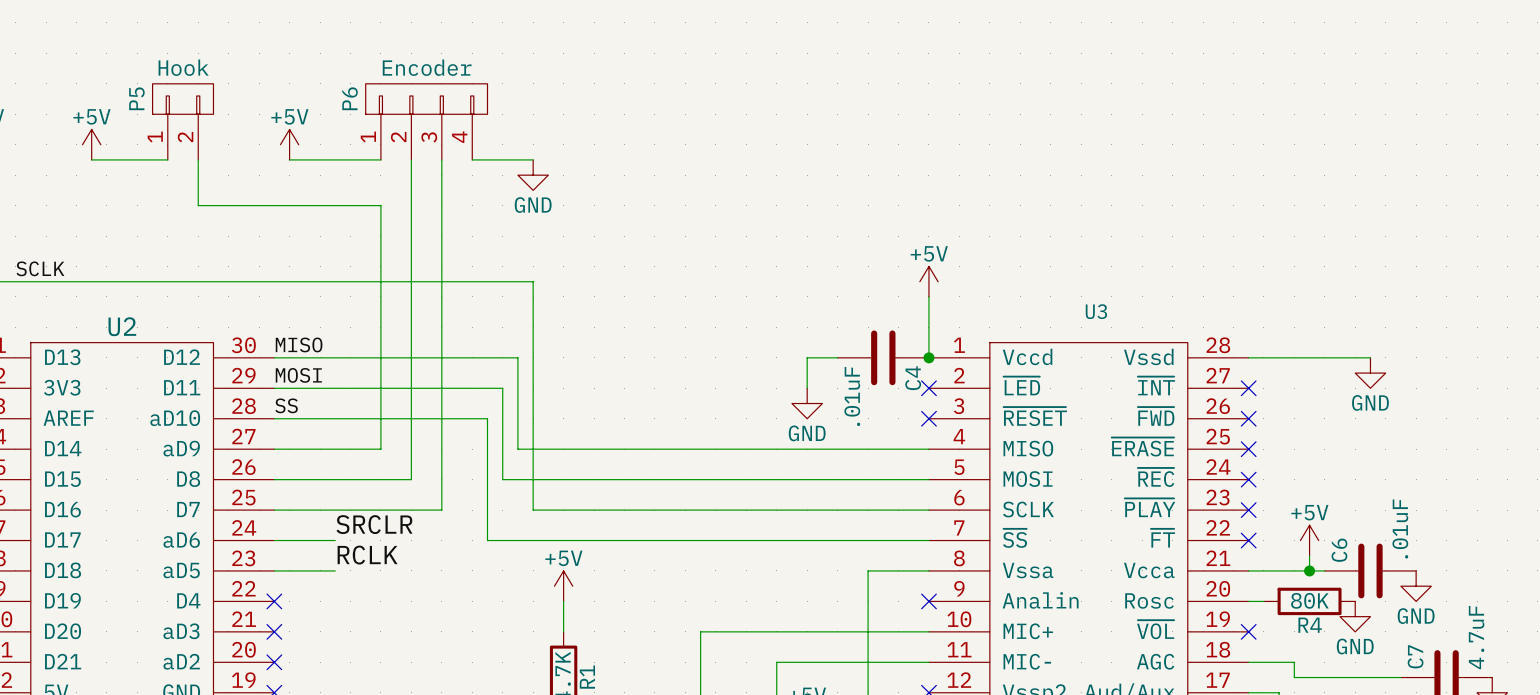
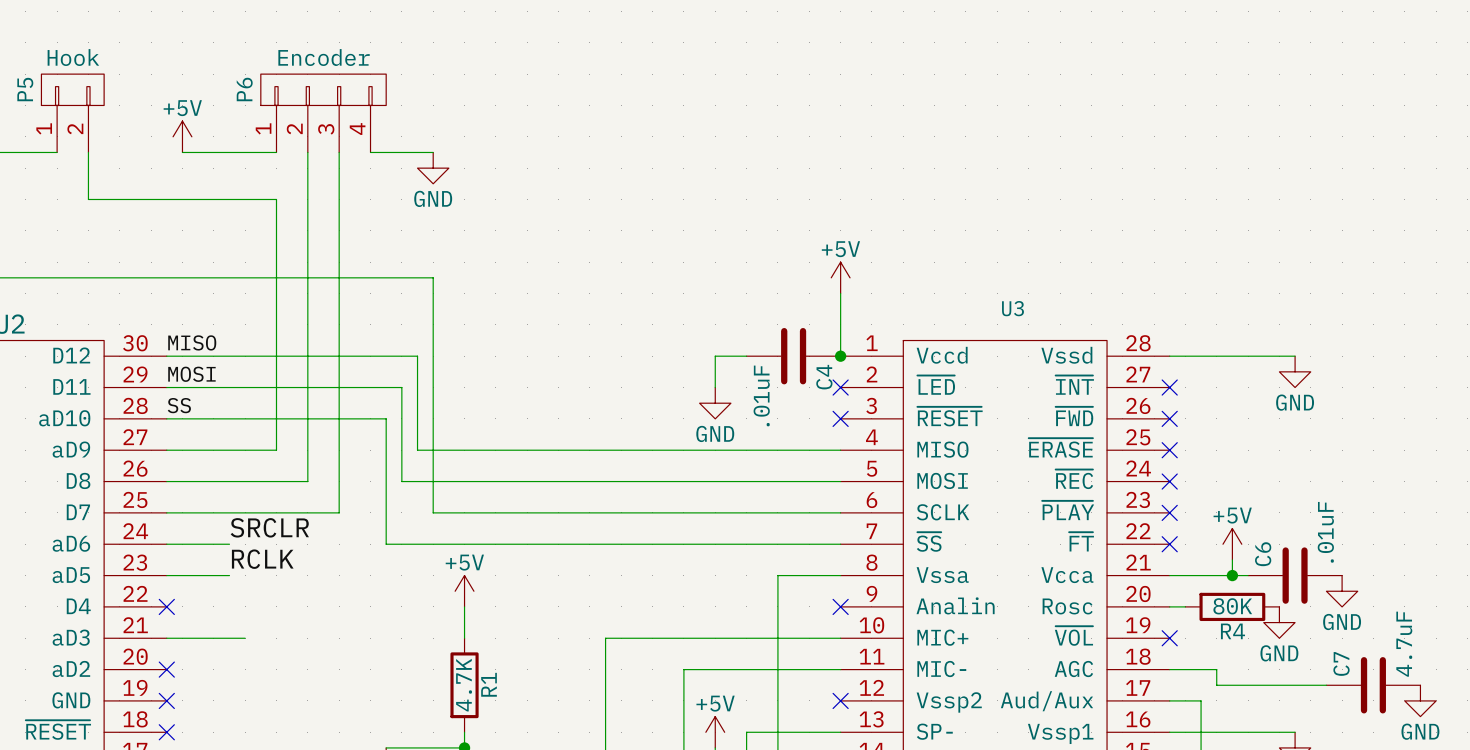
wire: none -> (166, 638) (245, 638)
no-connect mark: (274, 631) -> none

